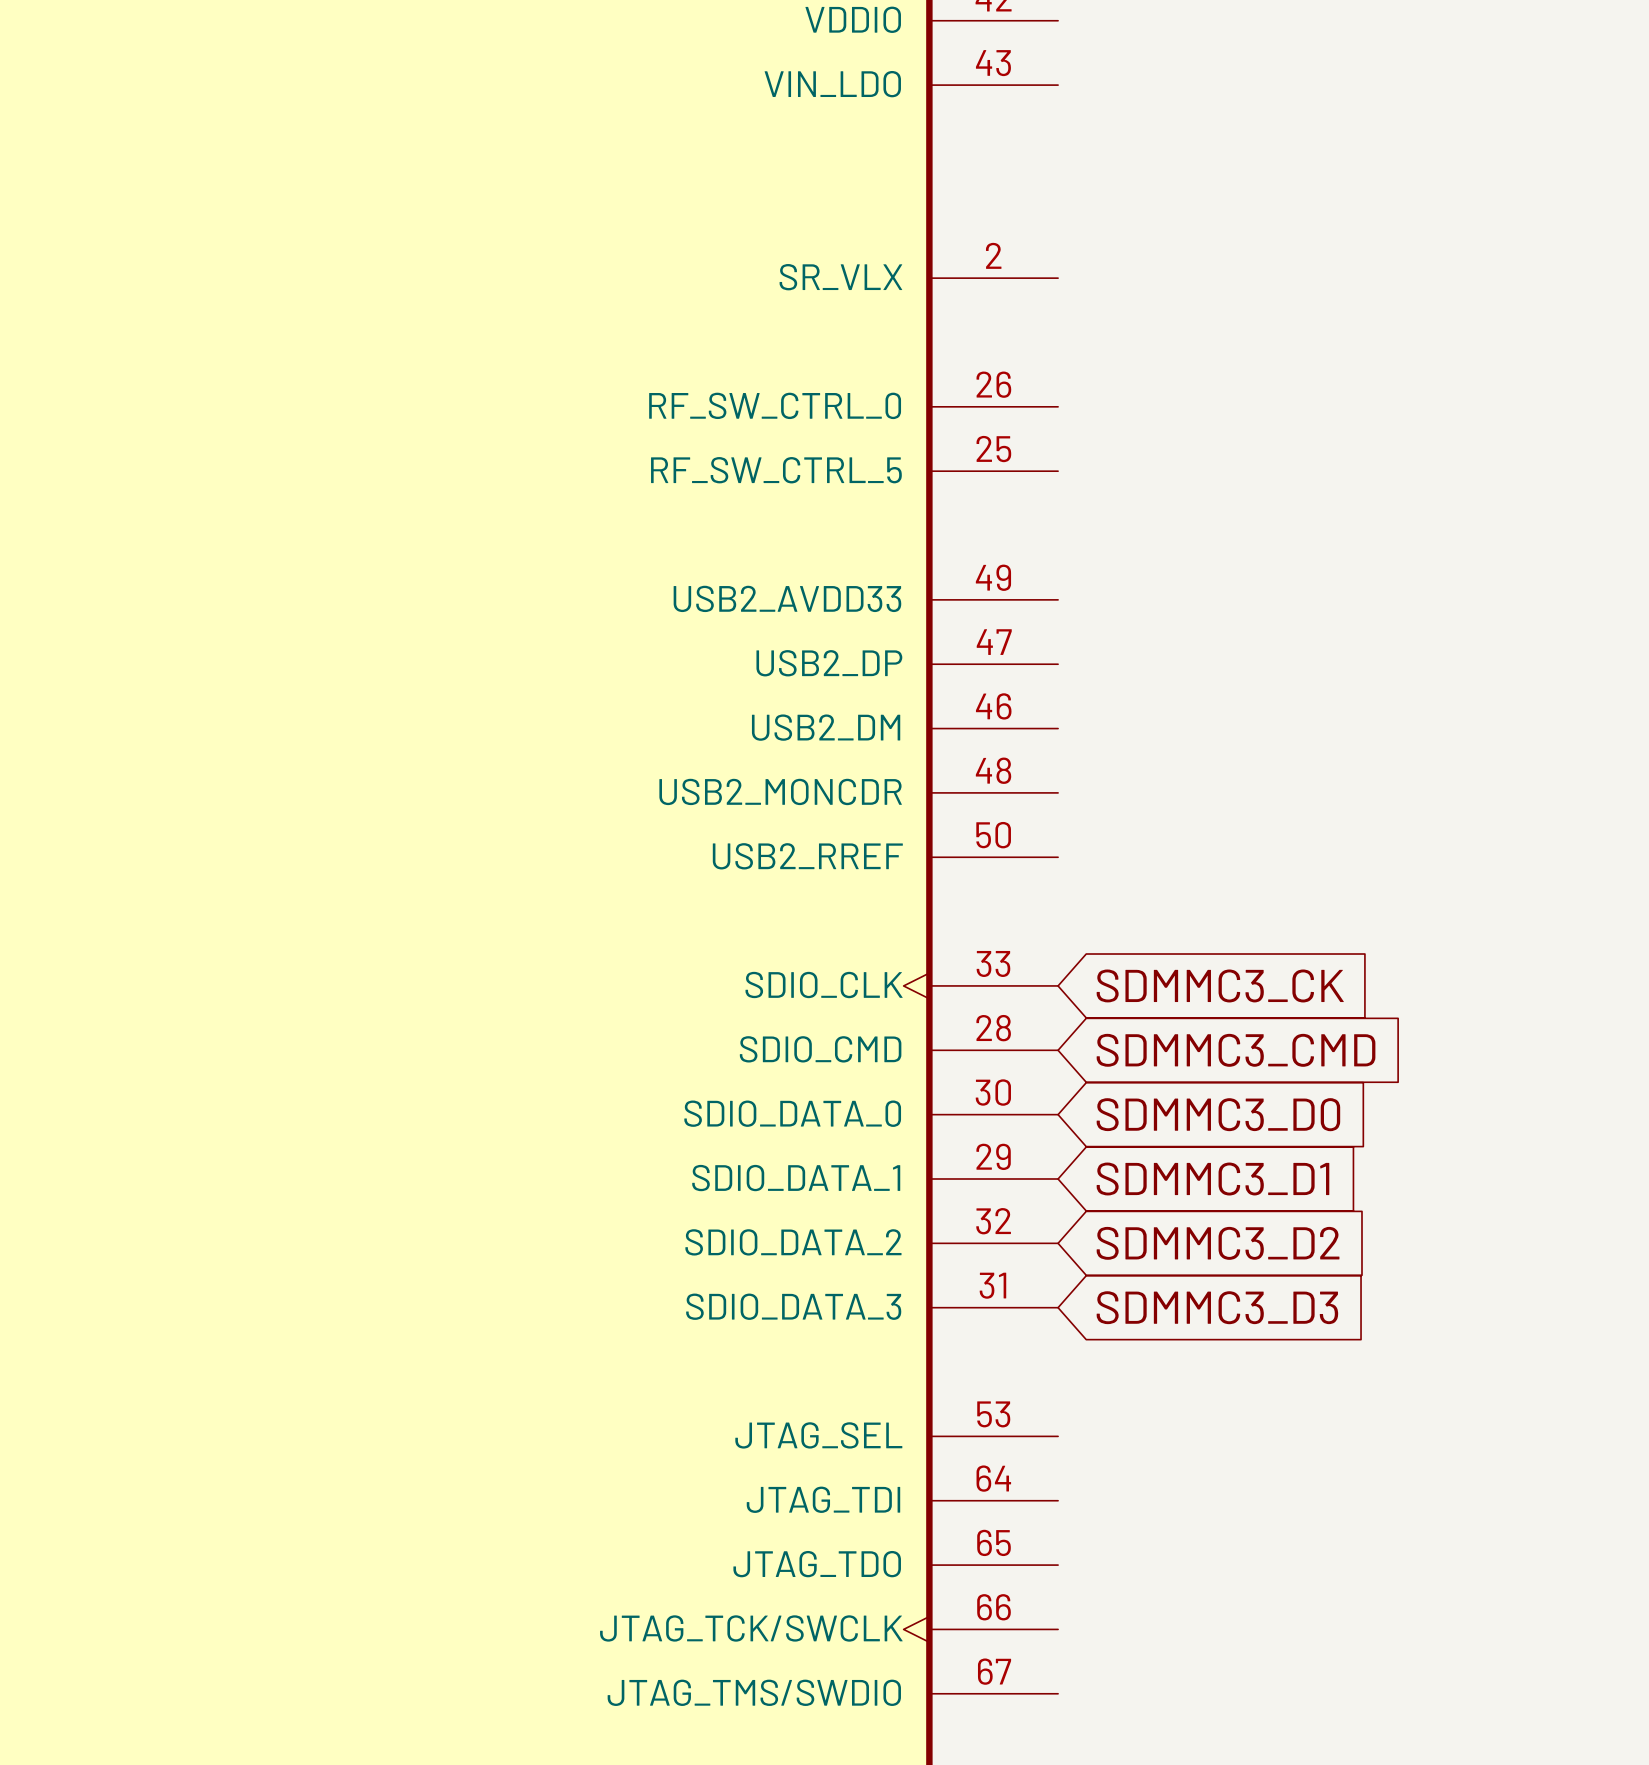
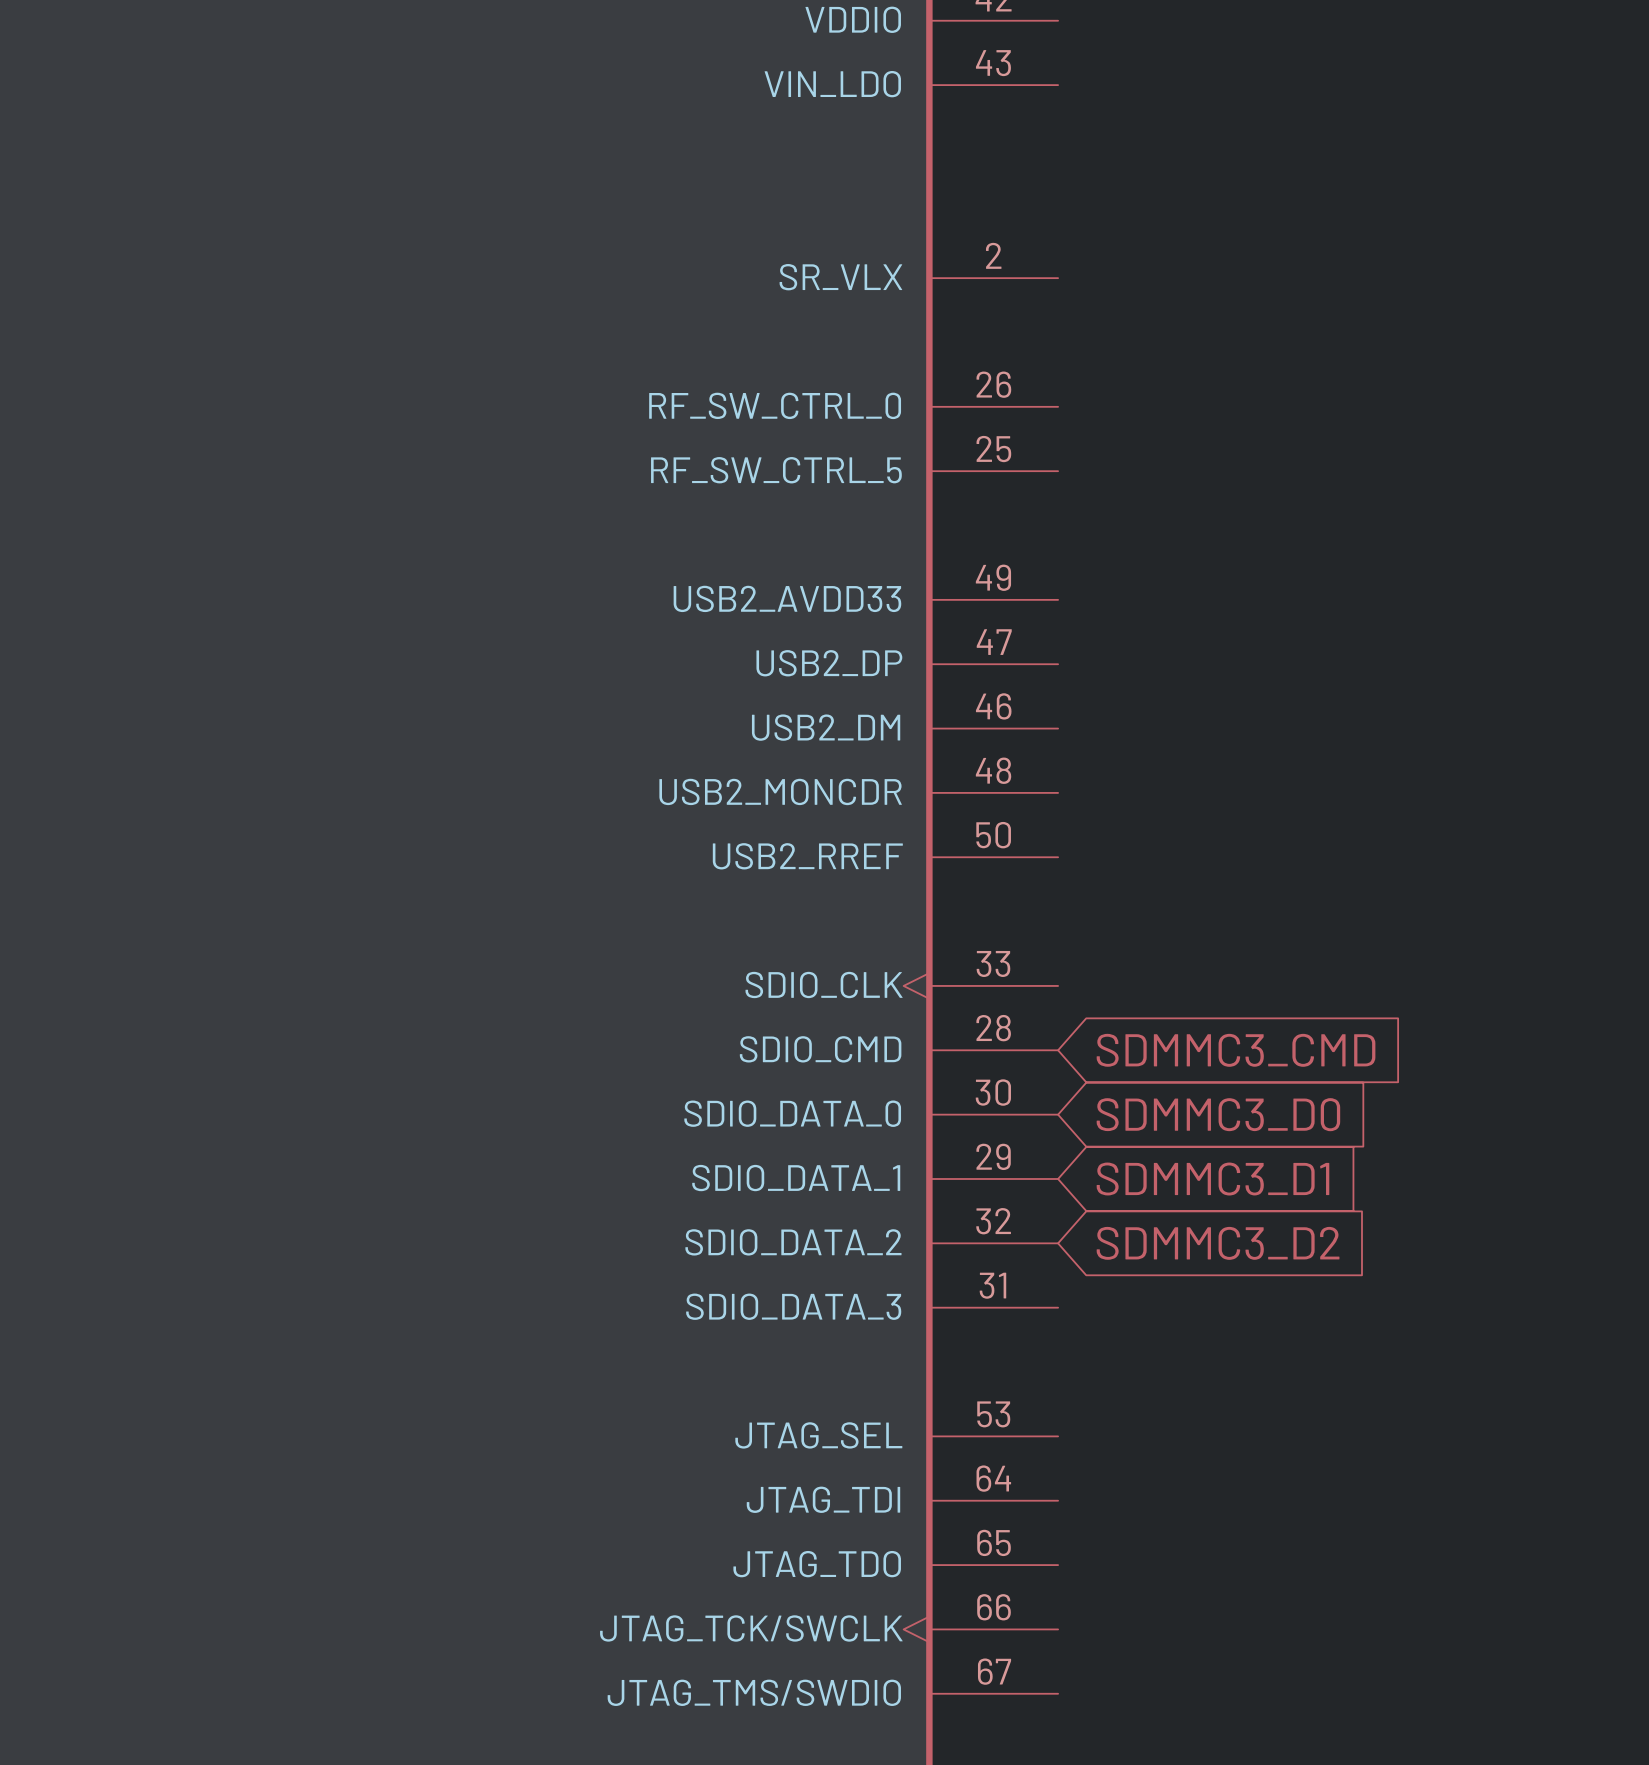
global label: SDMMC3_CK (1220, 985) -> none
global label: SDMMC3_D3 (1217, 1307) -> none

